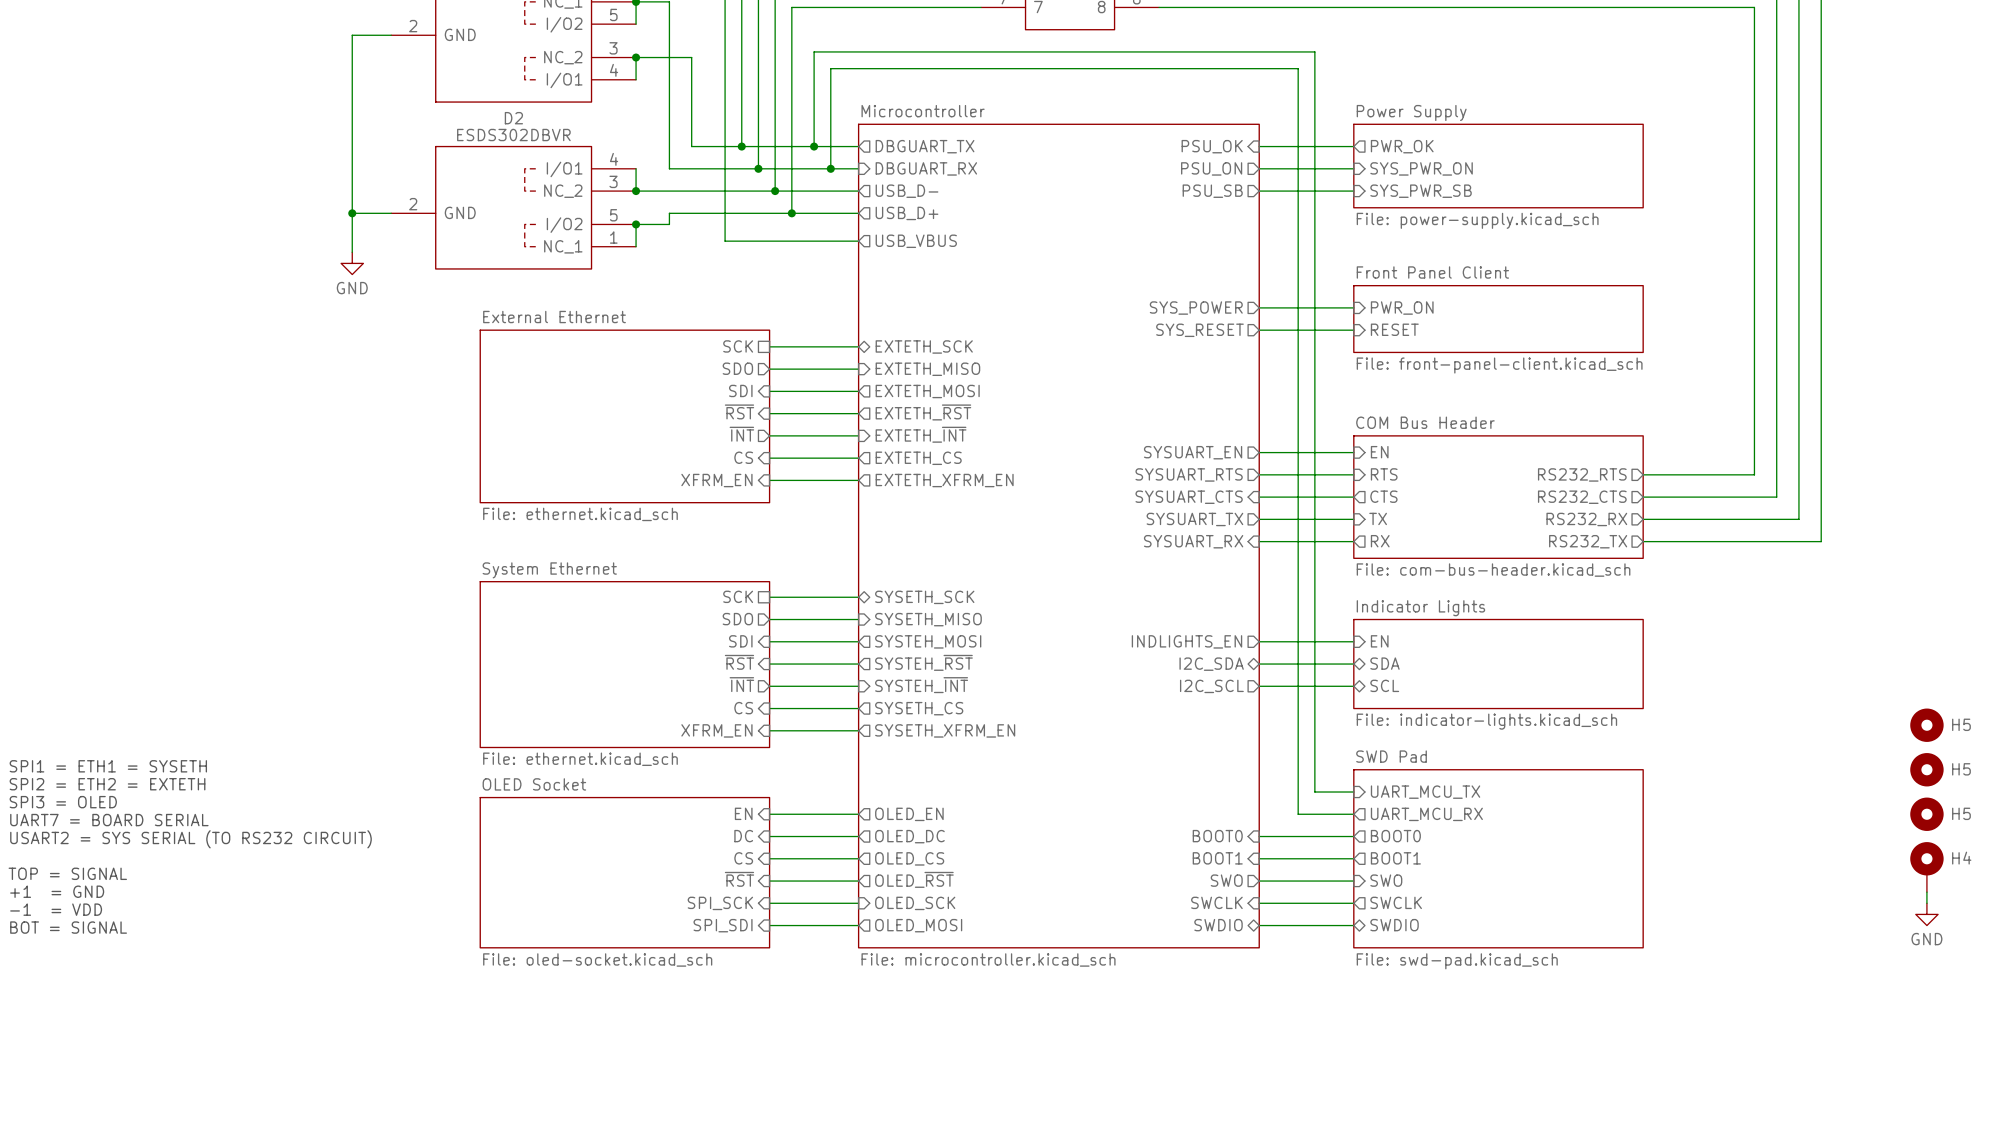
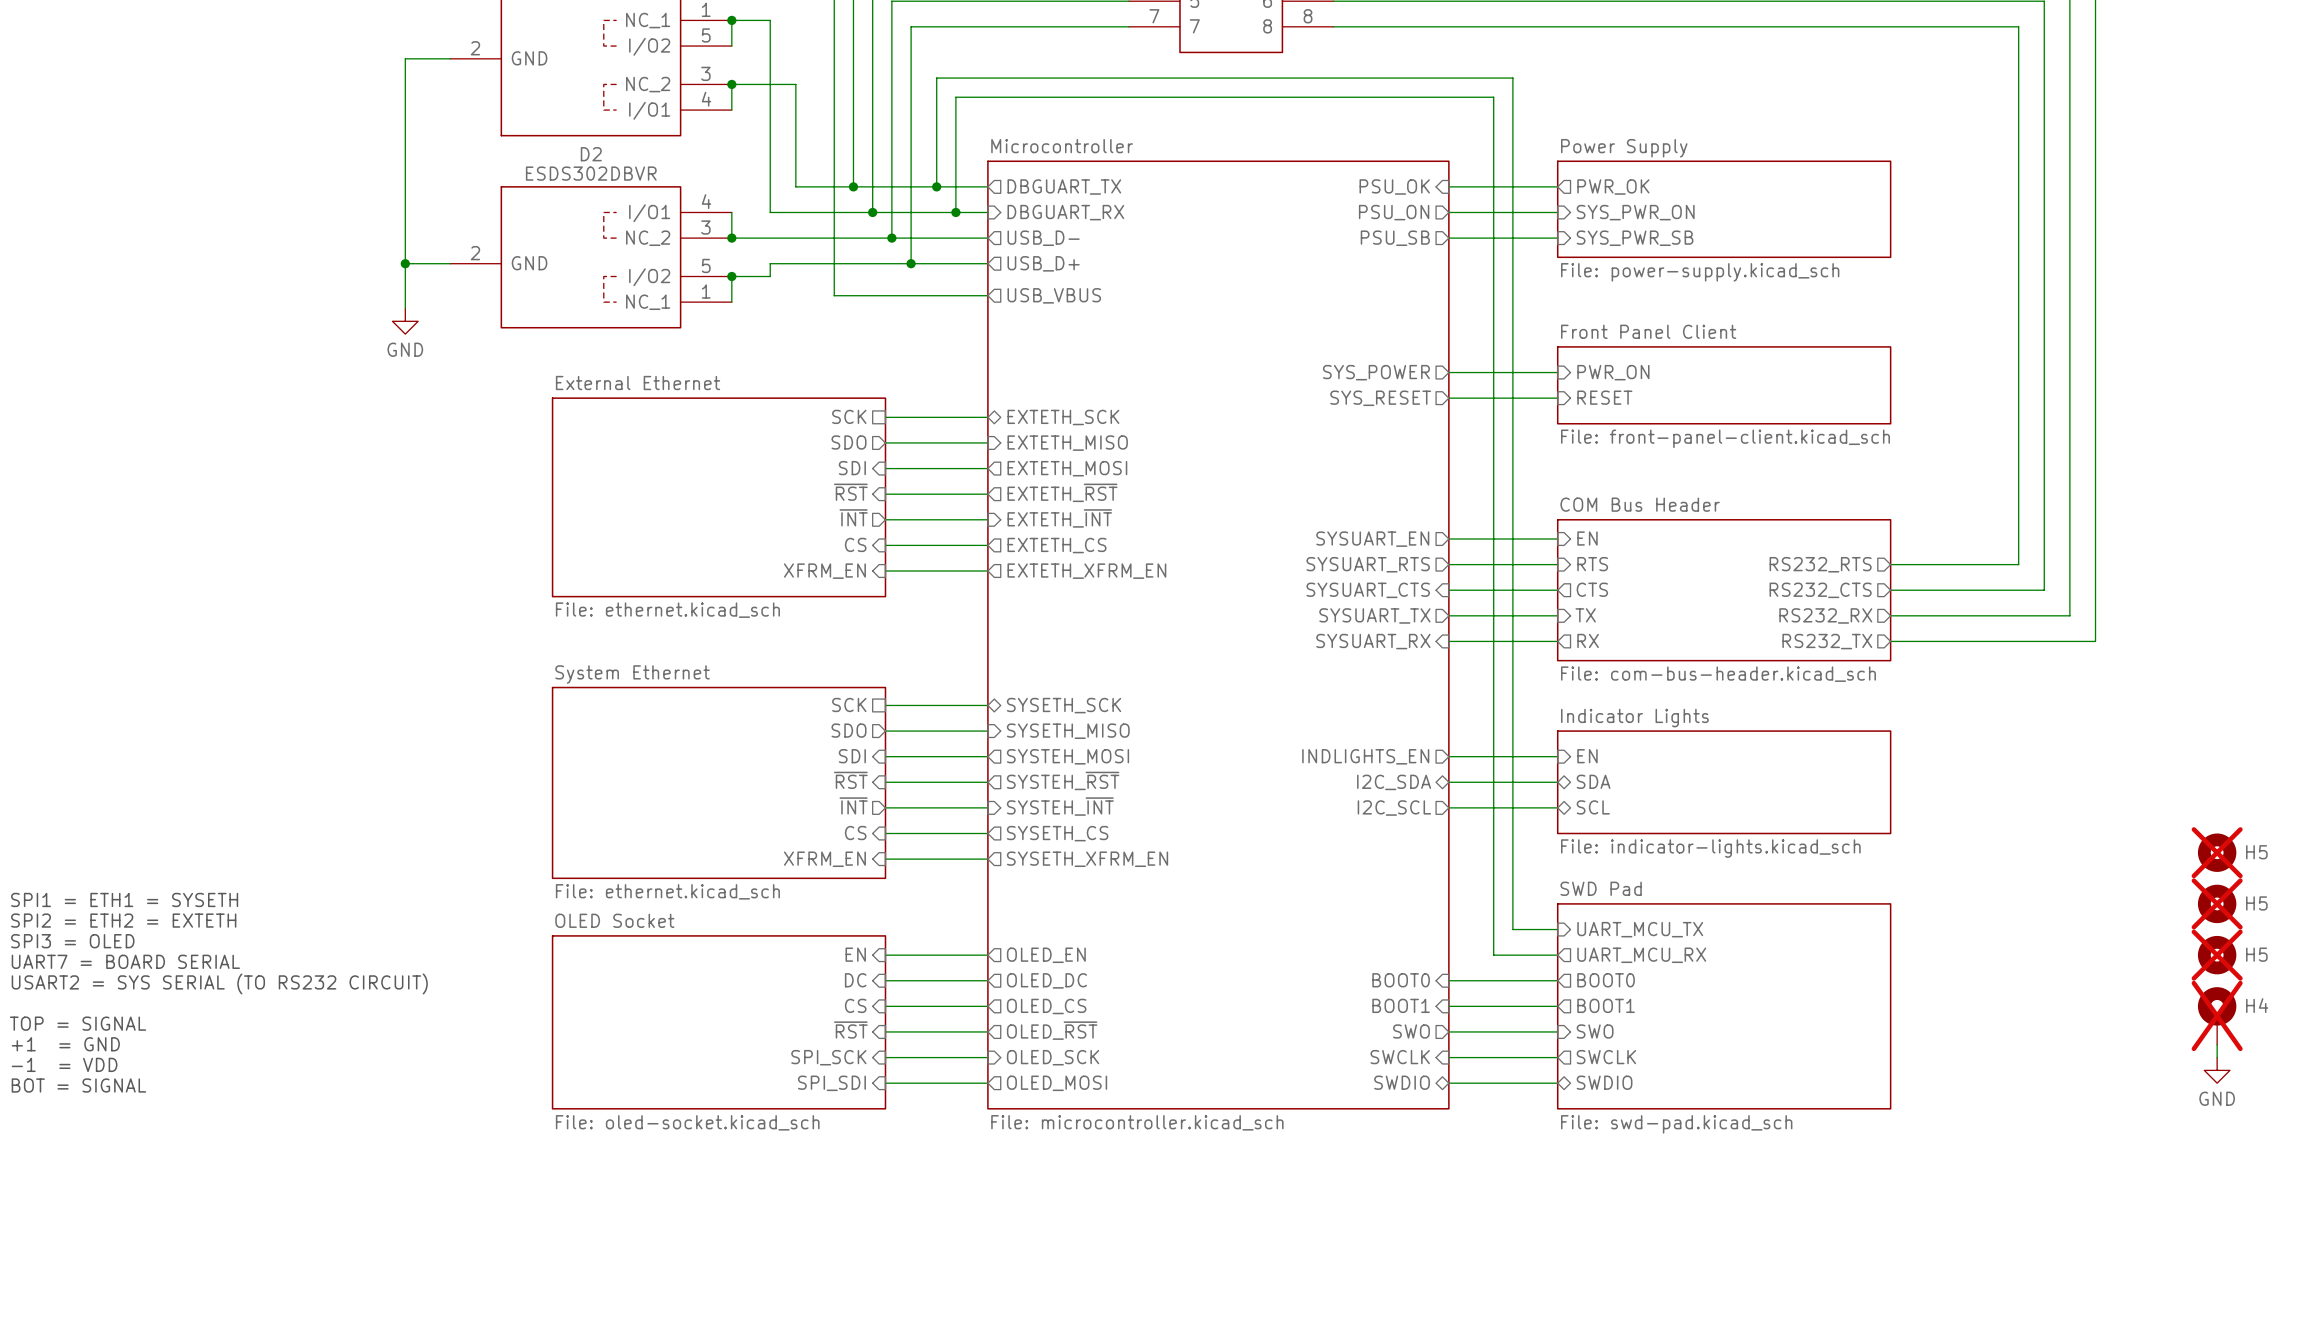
H5 do-not-place cross: none -> (2217, 852)
H5 do-not-place cross: none -> (2217, 903)
H5 do-not-place cross: none -> (2217, 955)
H4 do-not-place cross: none -> (2217, 1015)

